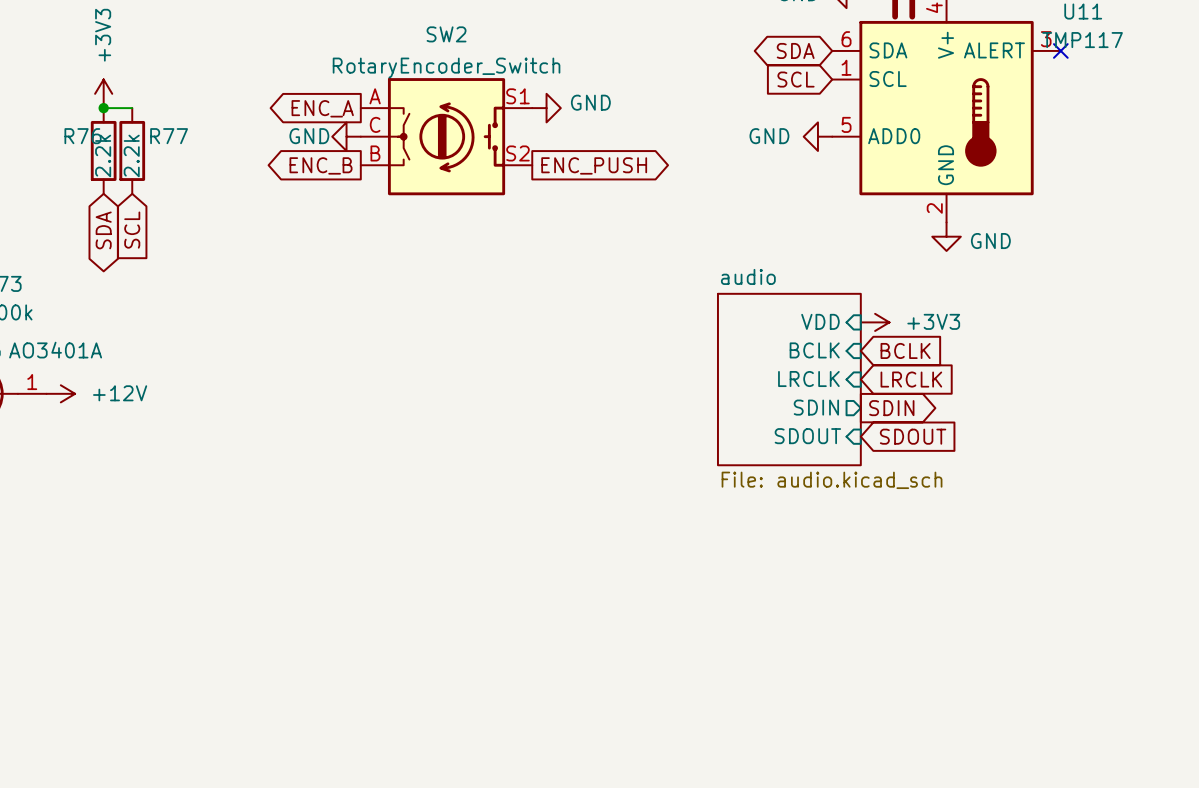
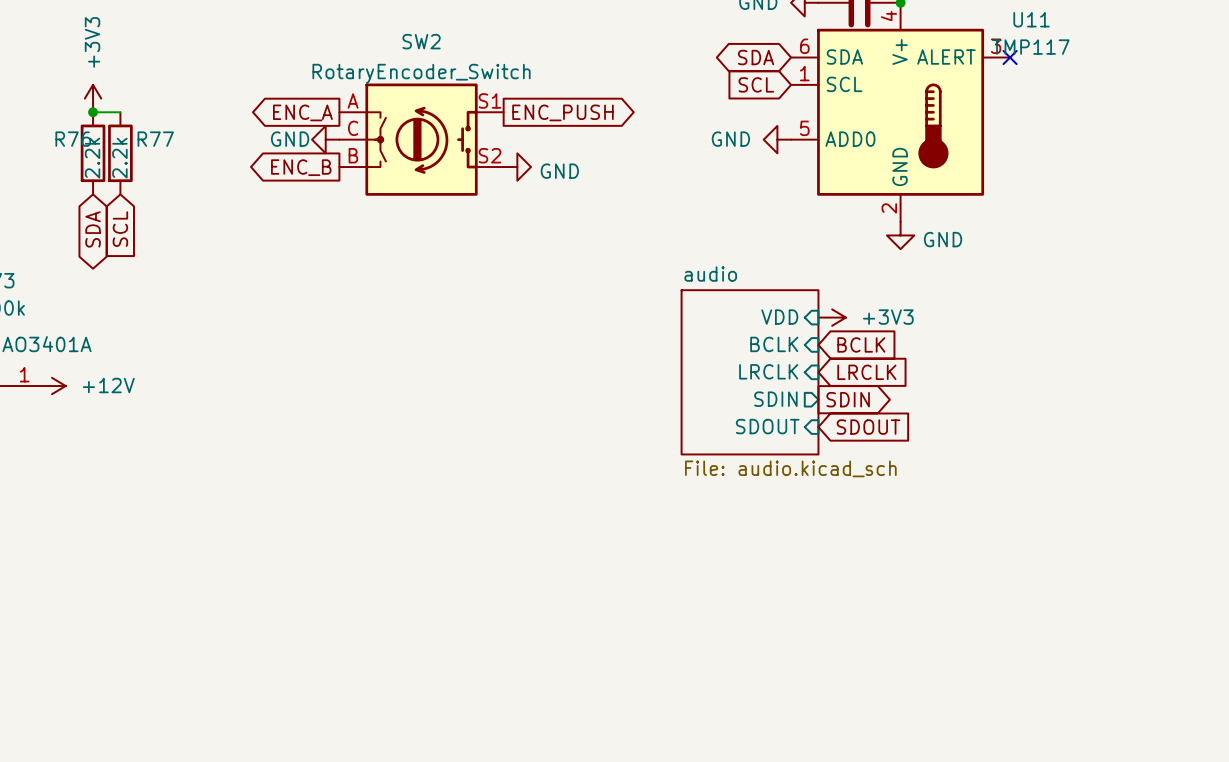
power symbol text position: GND (590, 102) -> GND (559, 171)
power symbol position: GND (546, 108) -> GND (517, 167)
global label position: ENC_PUSH (594, 165) -> ENC_PUSH (562, 112)

